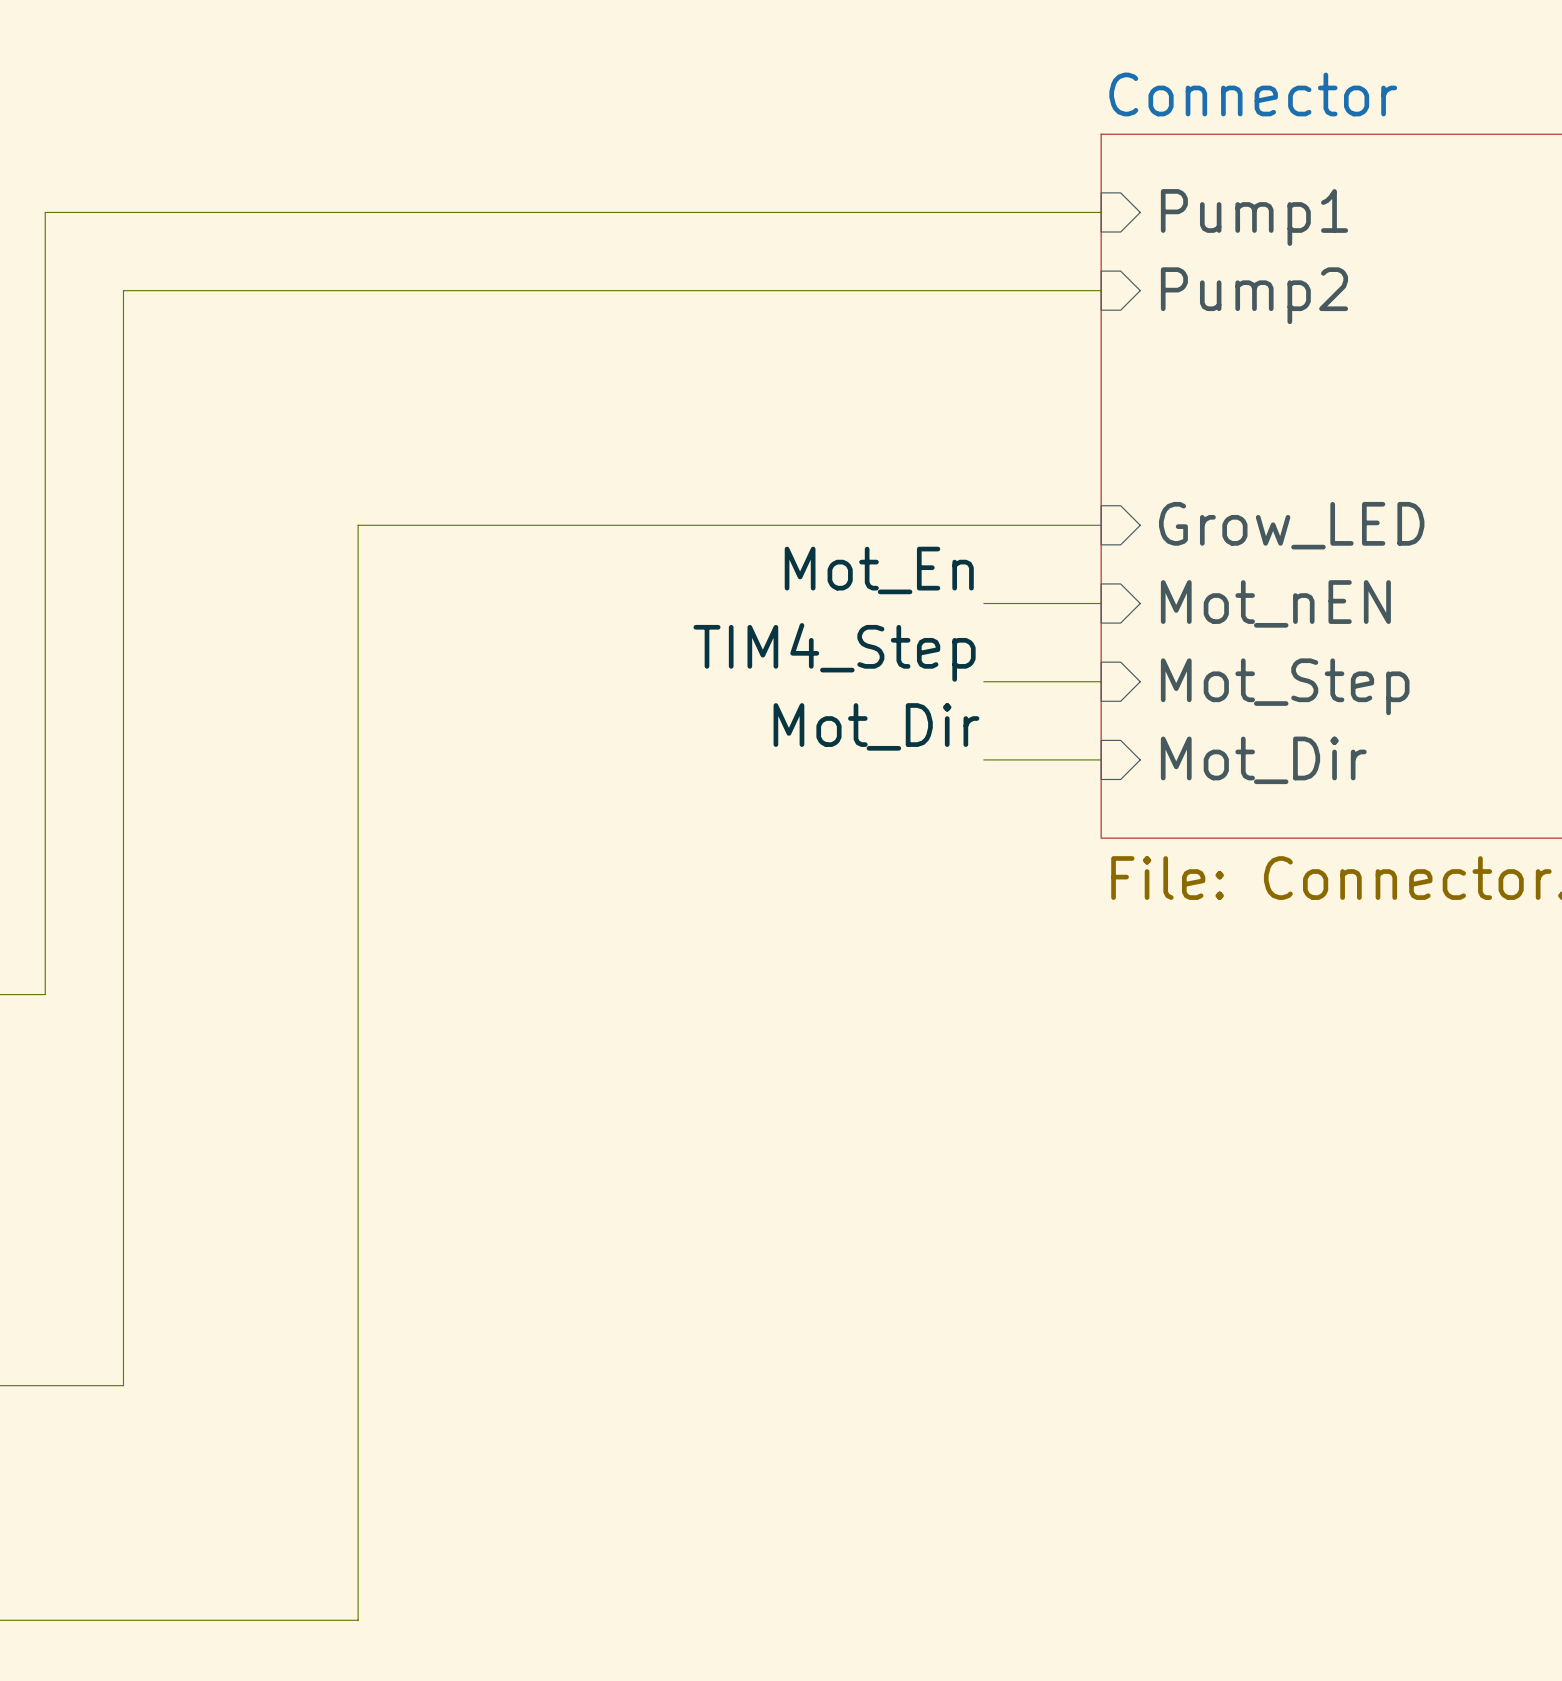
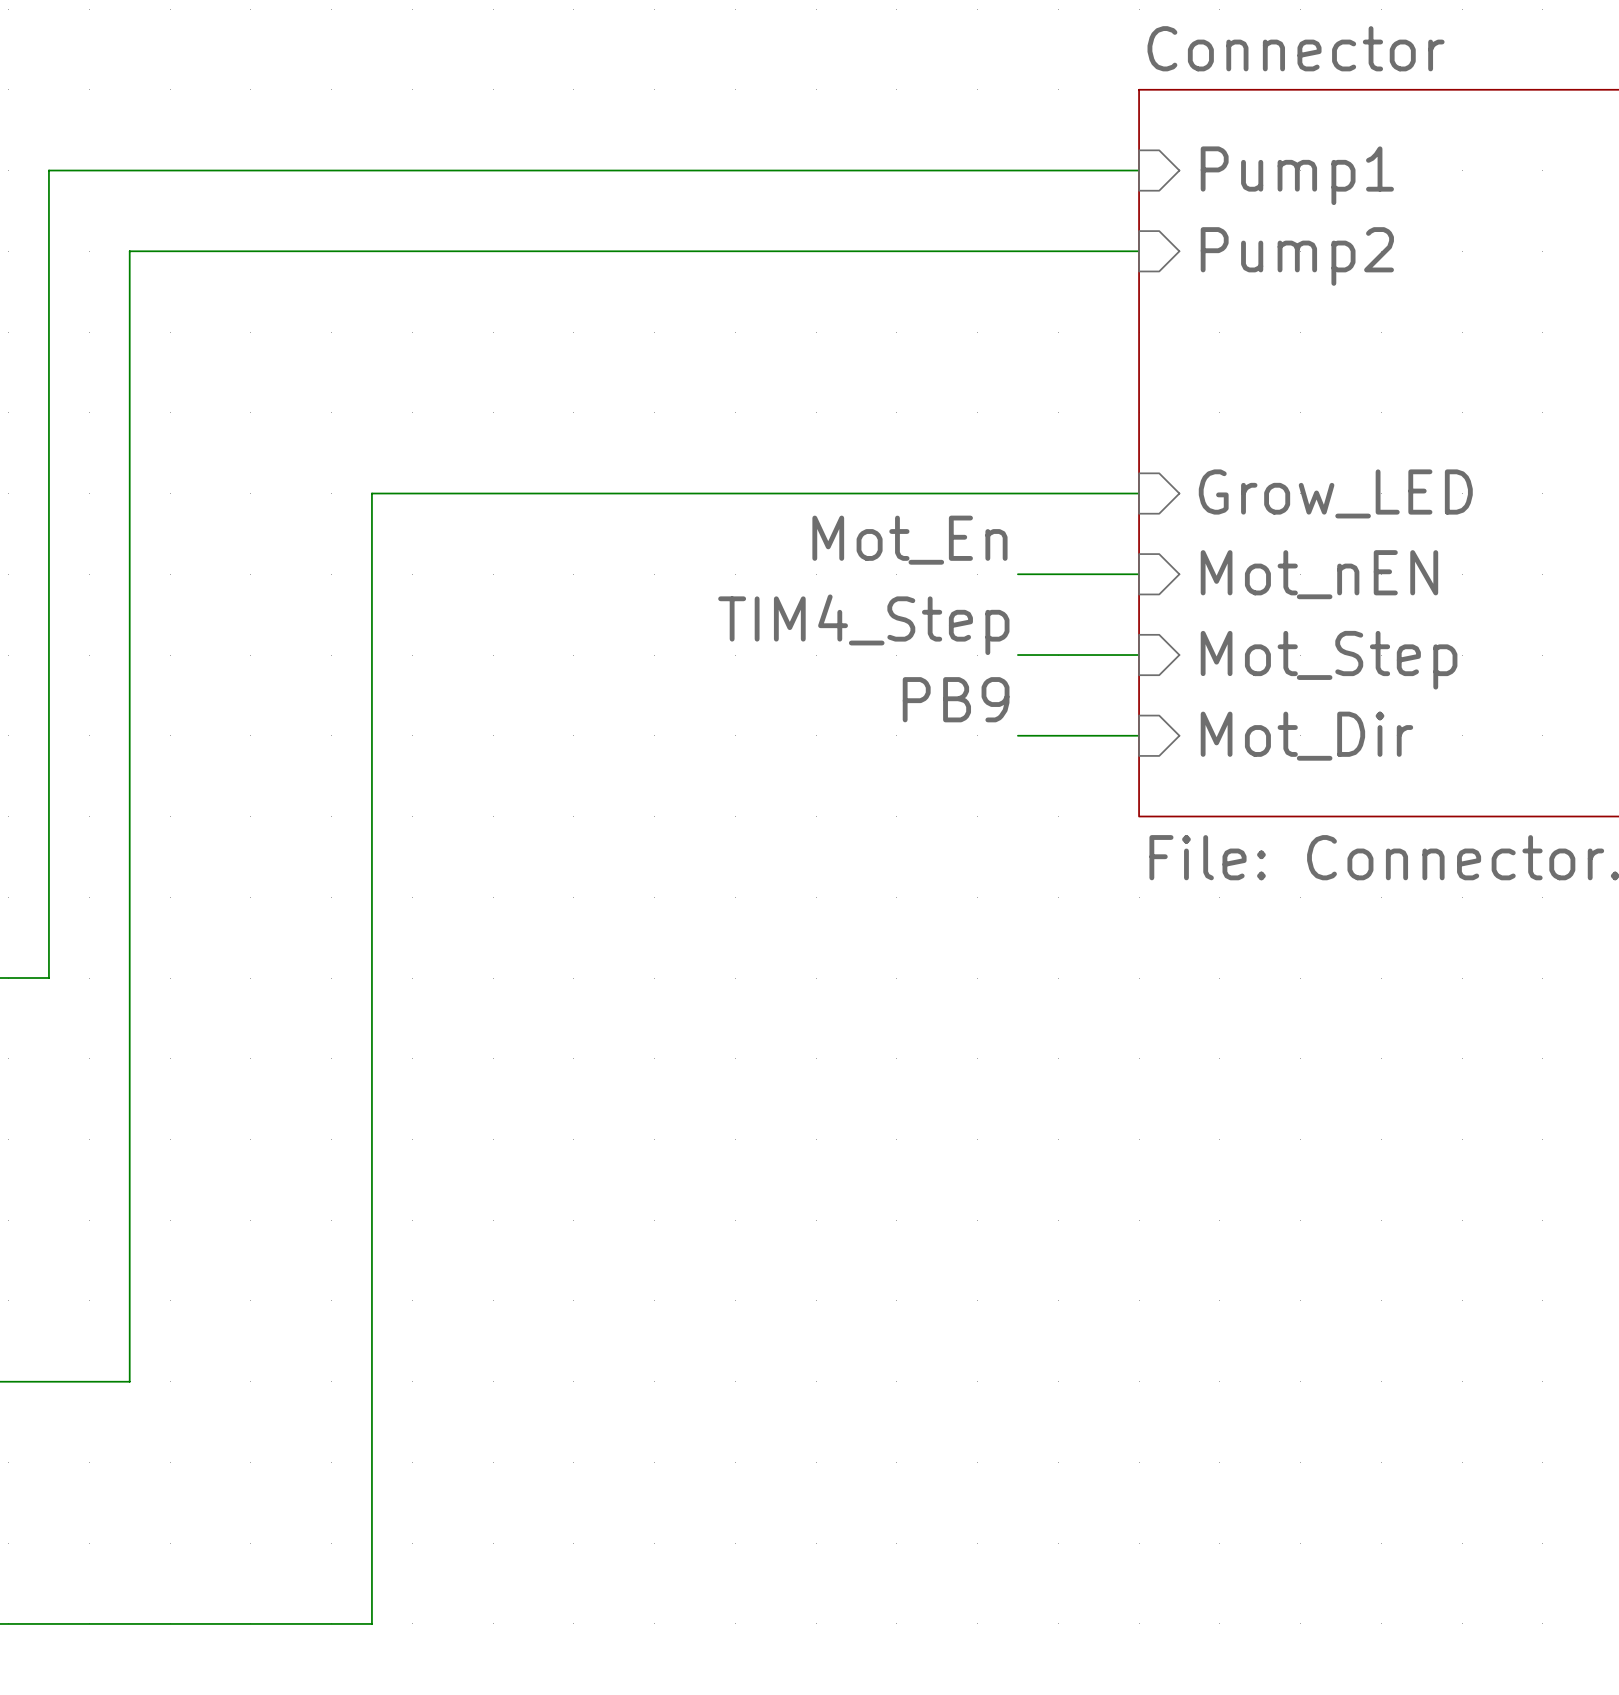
label: Mot_Dir (876, 726) -> PB9 (956, 699)

